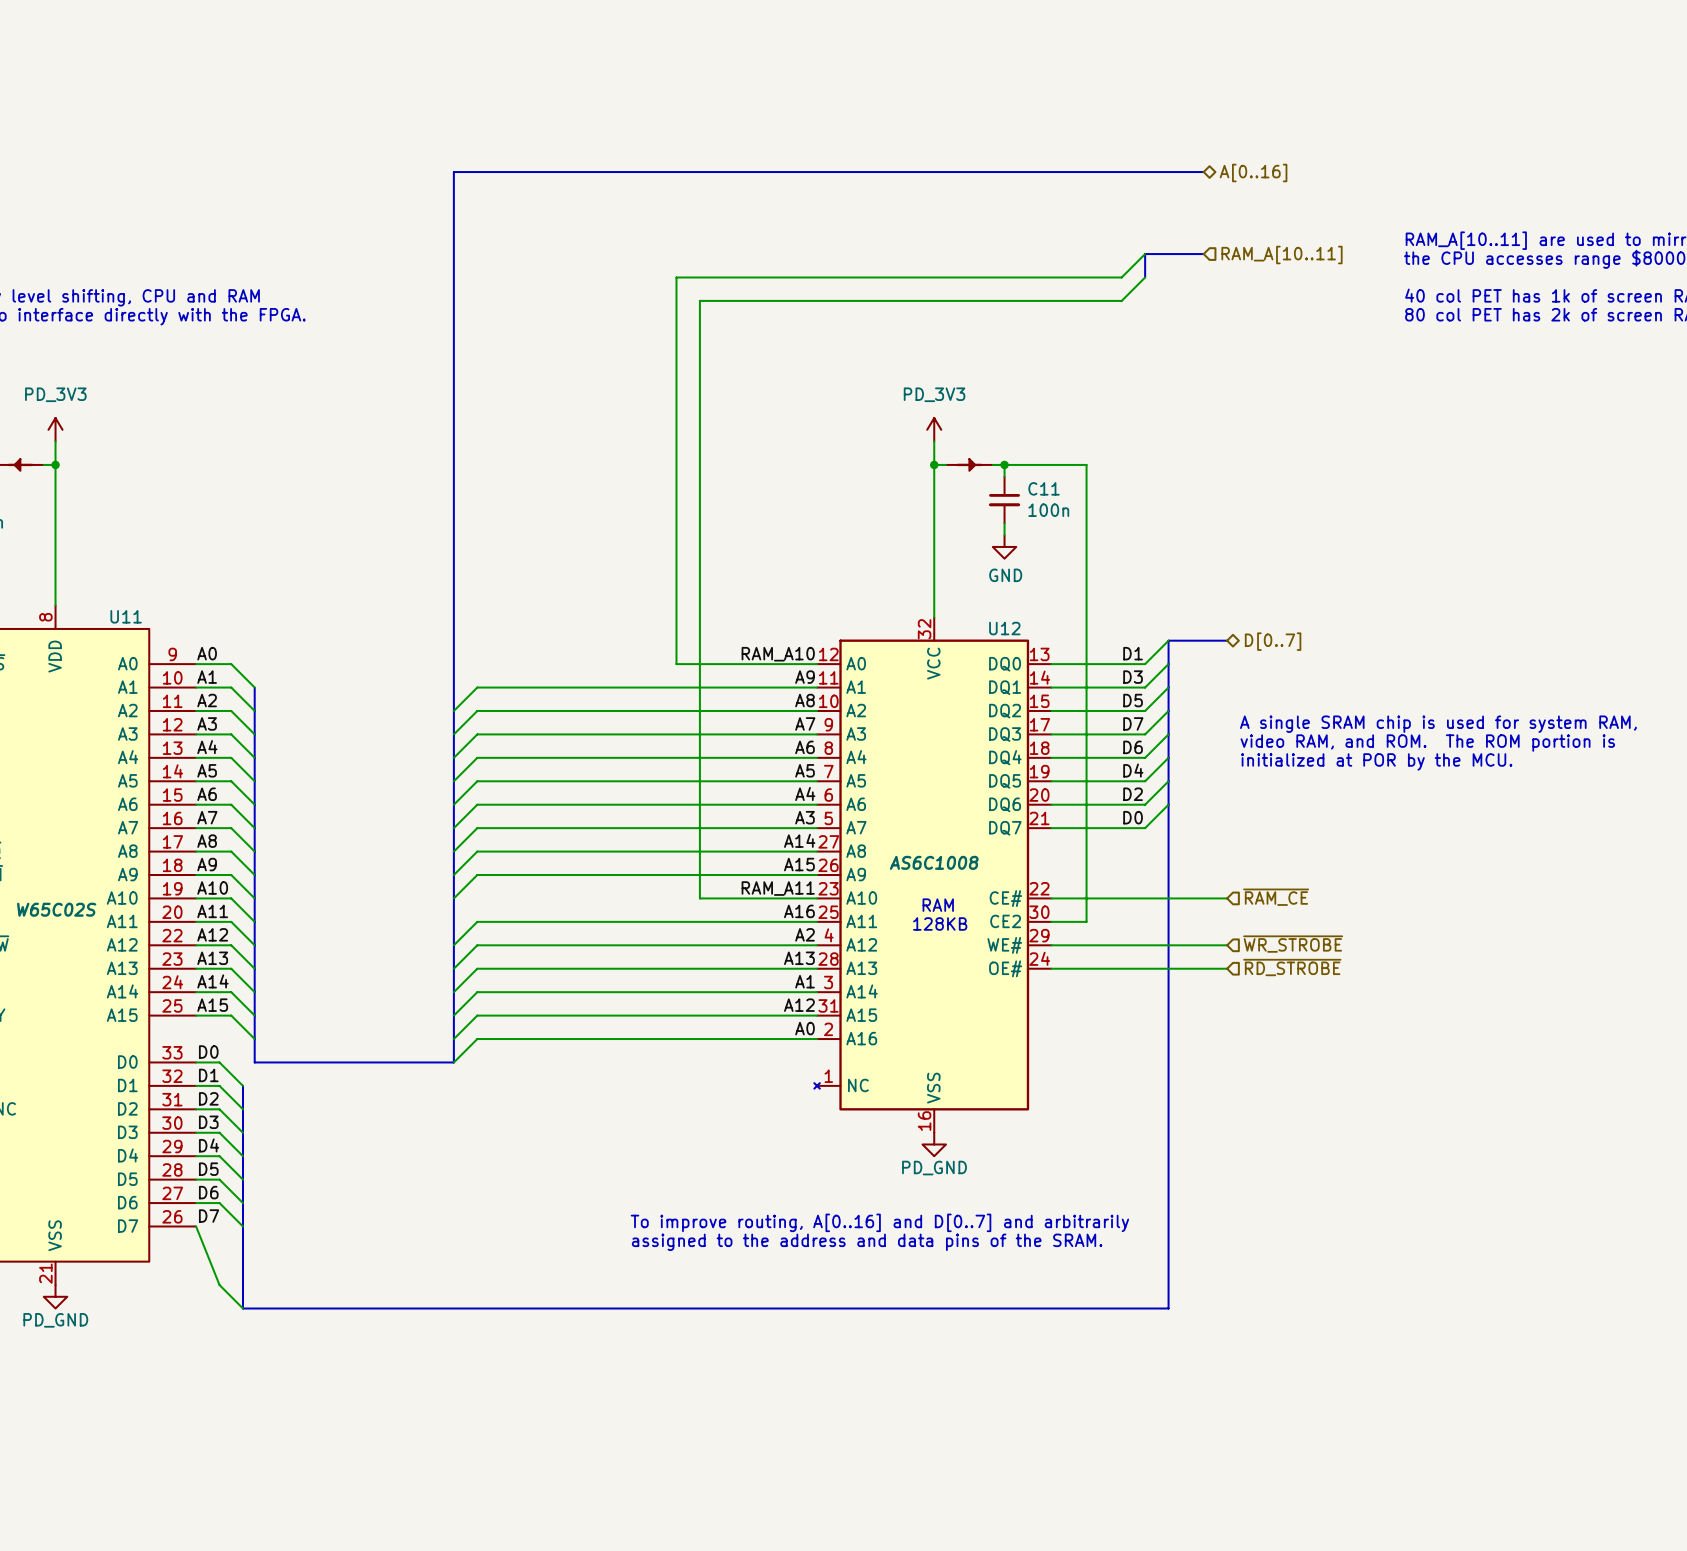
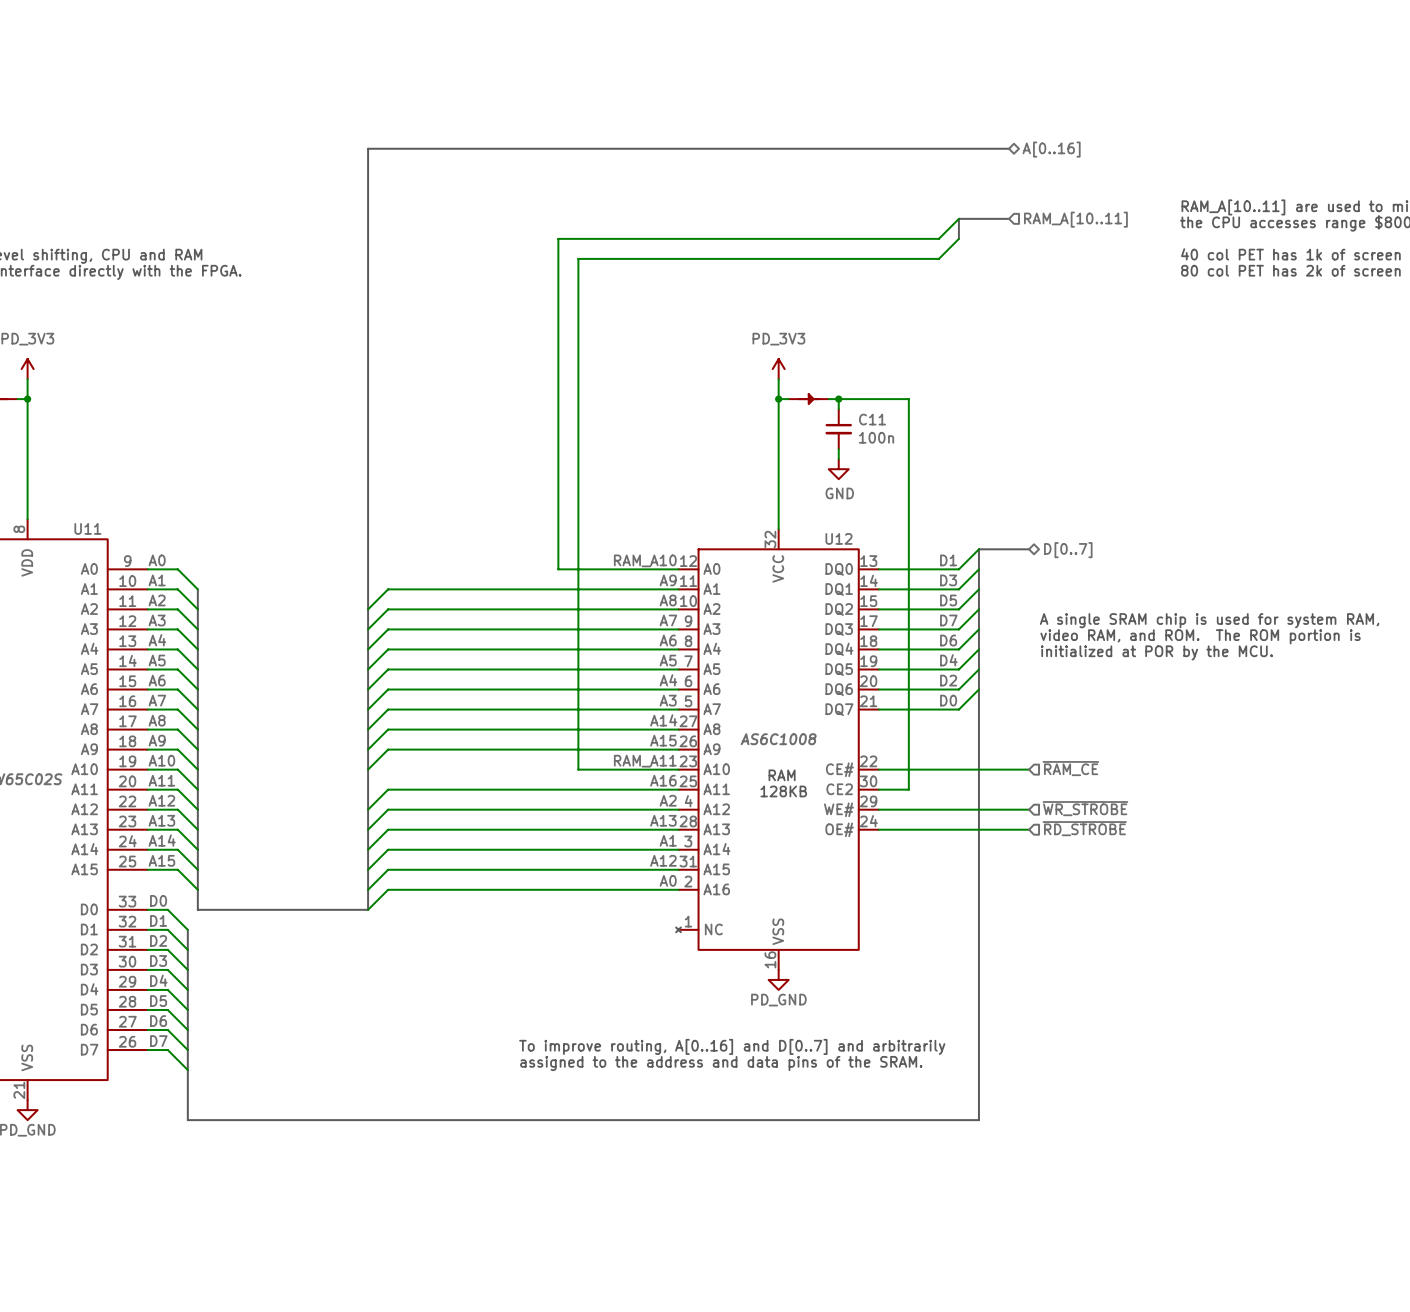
wire: (196, 1226) (219, 1285) (242, 1308) -> (147, 1050) (167, 1050) (187, 1070)

